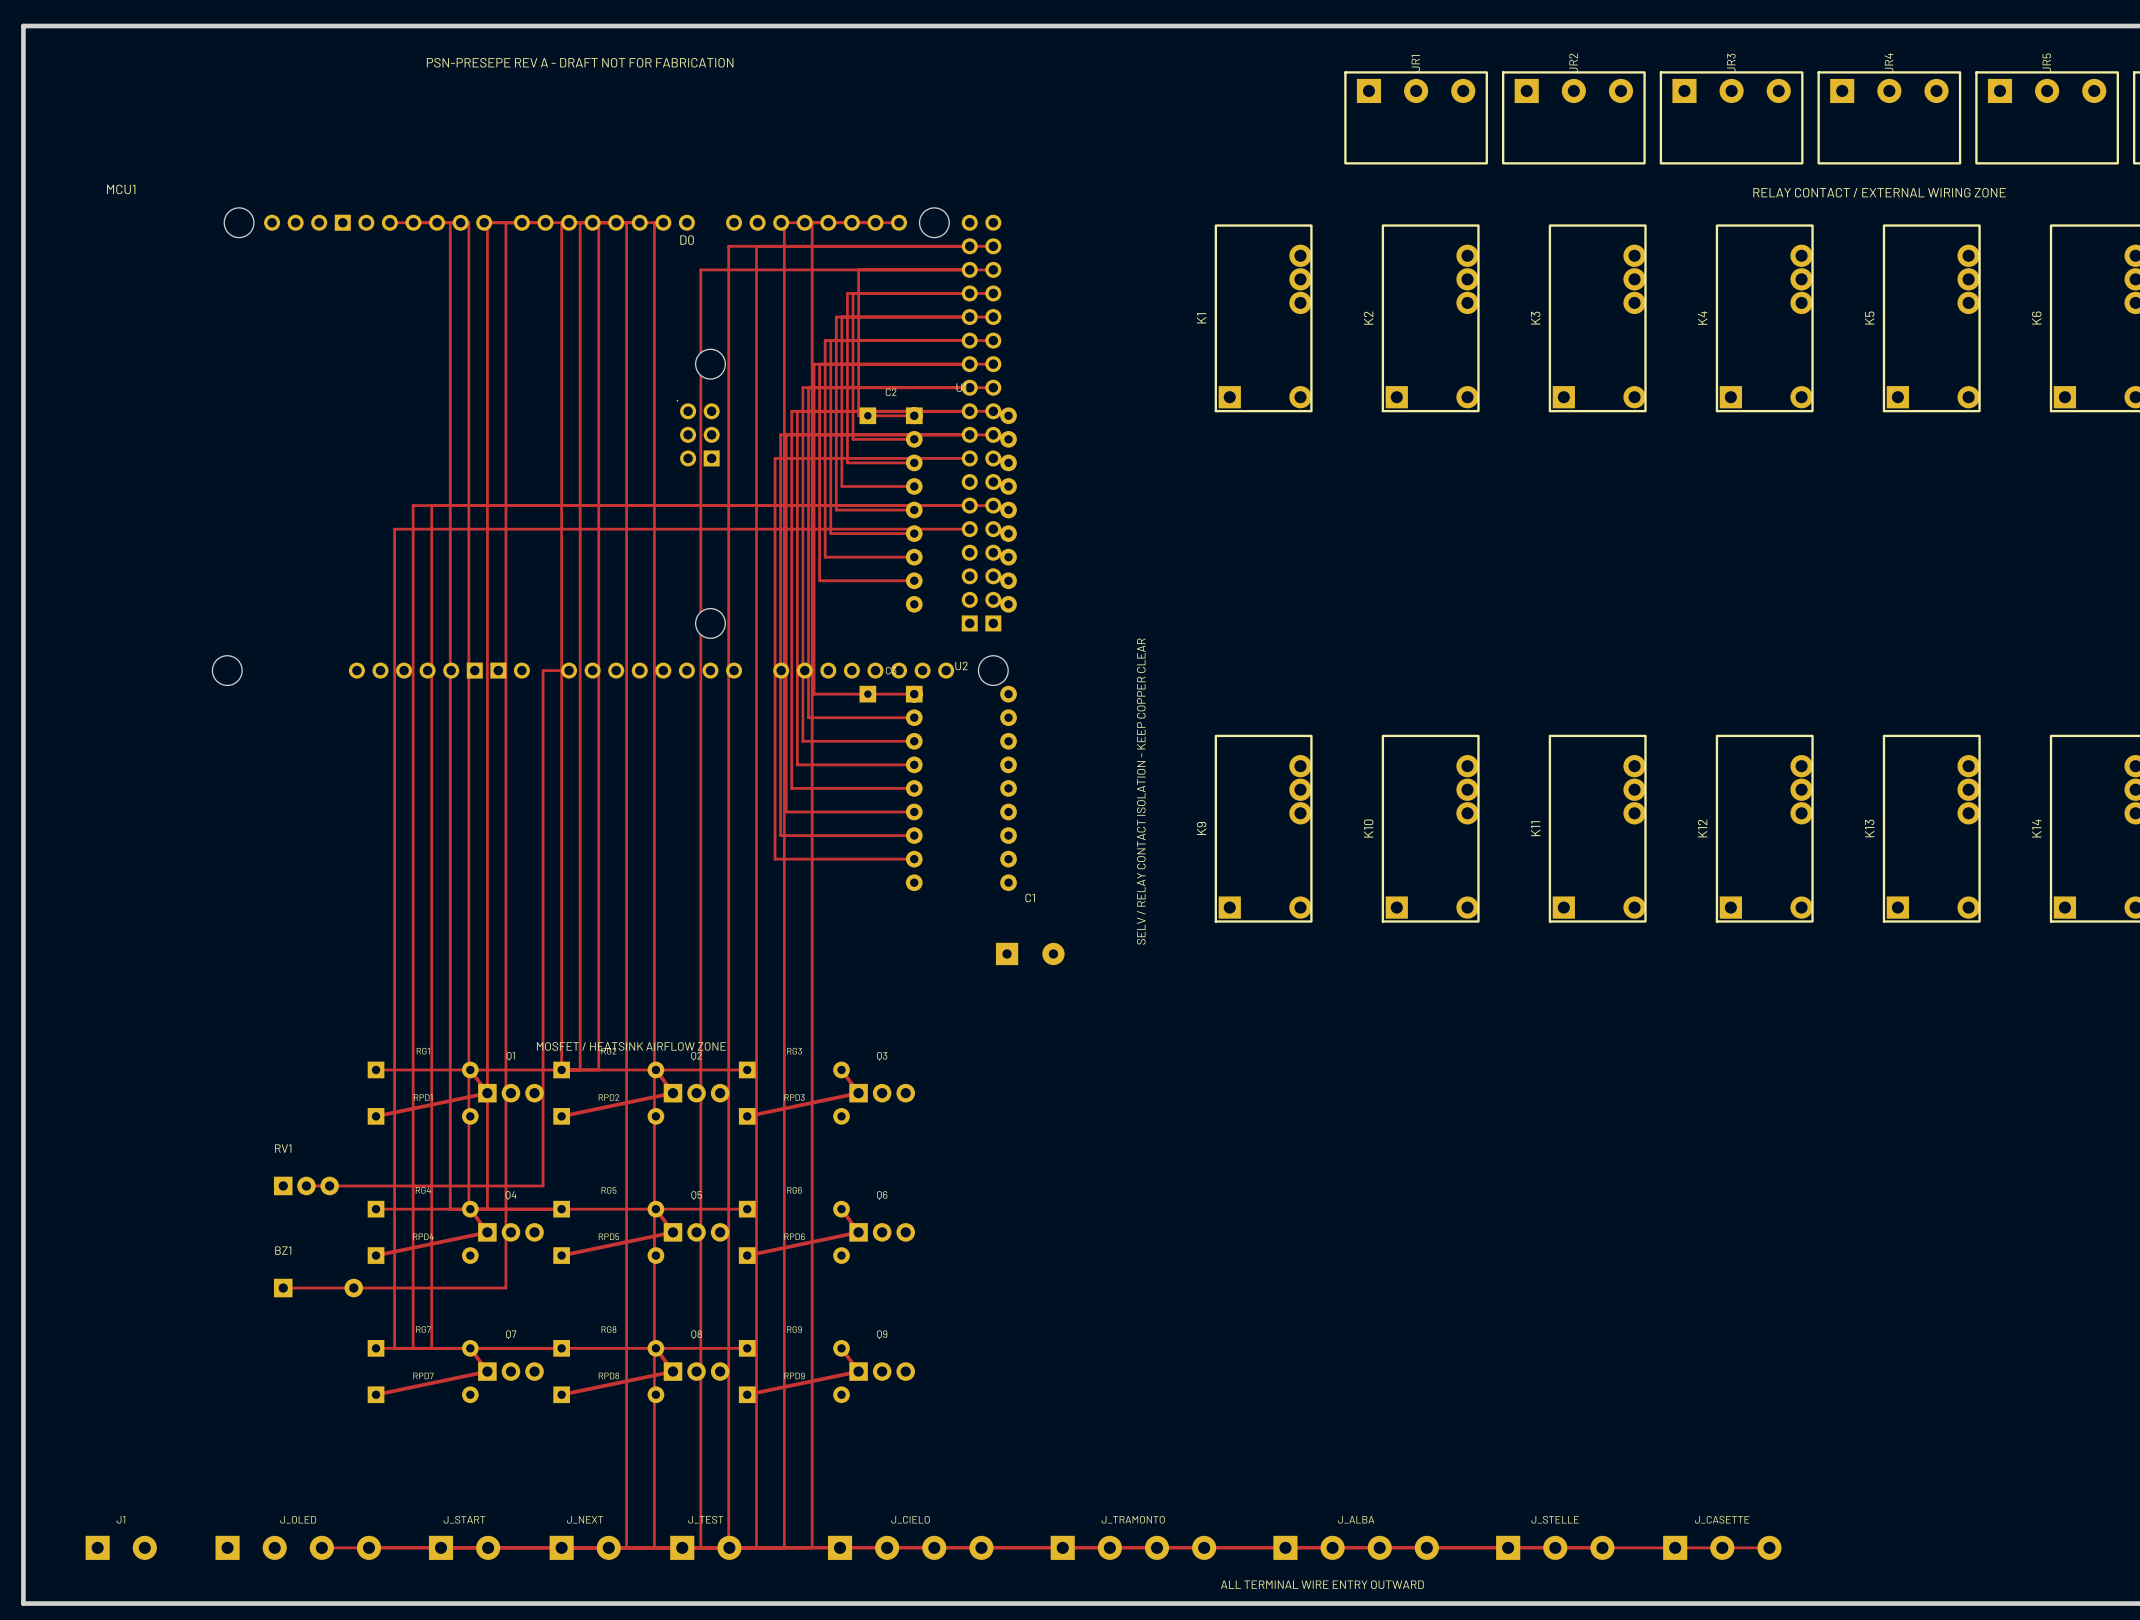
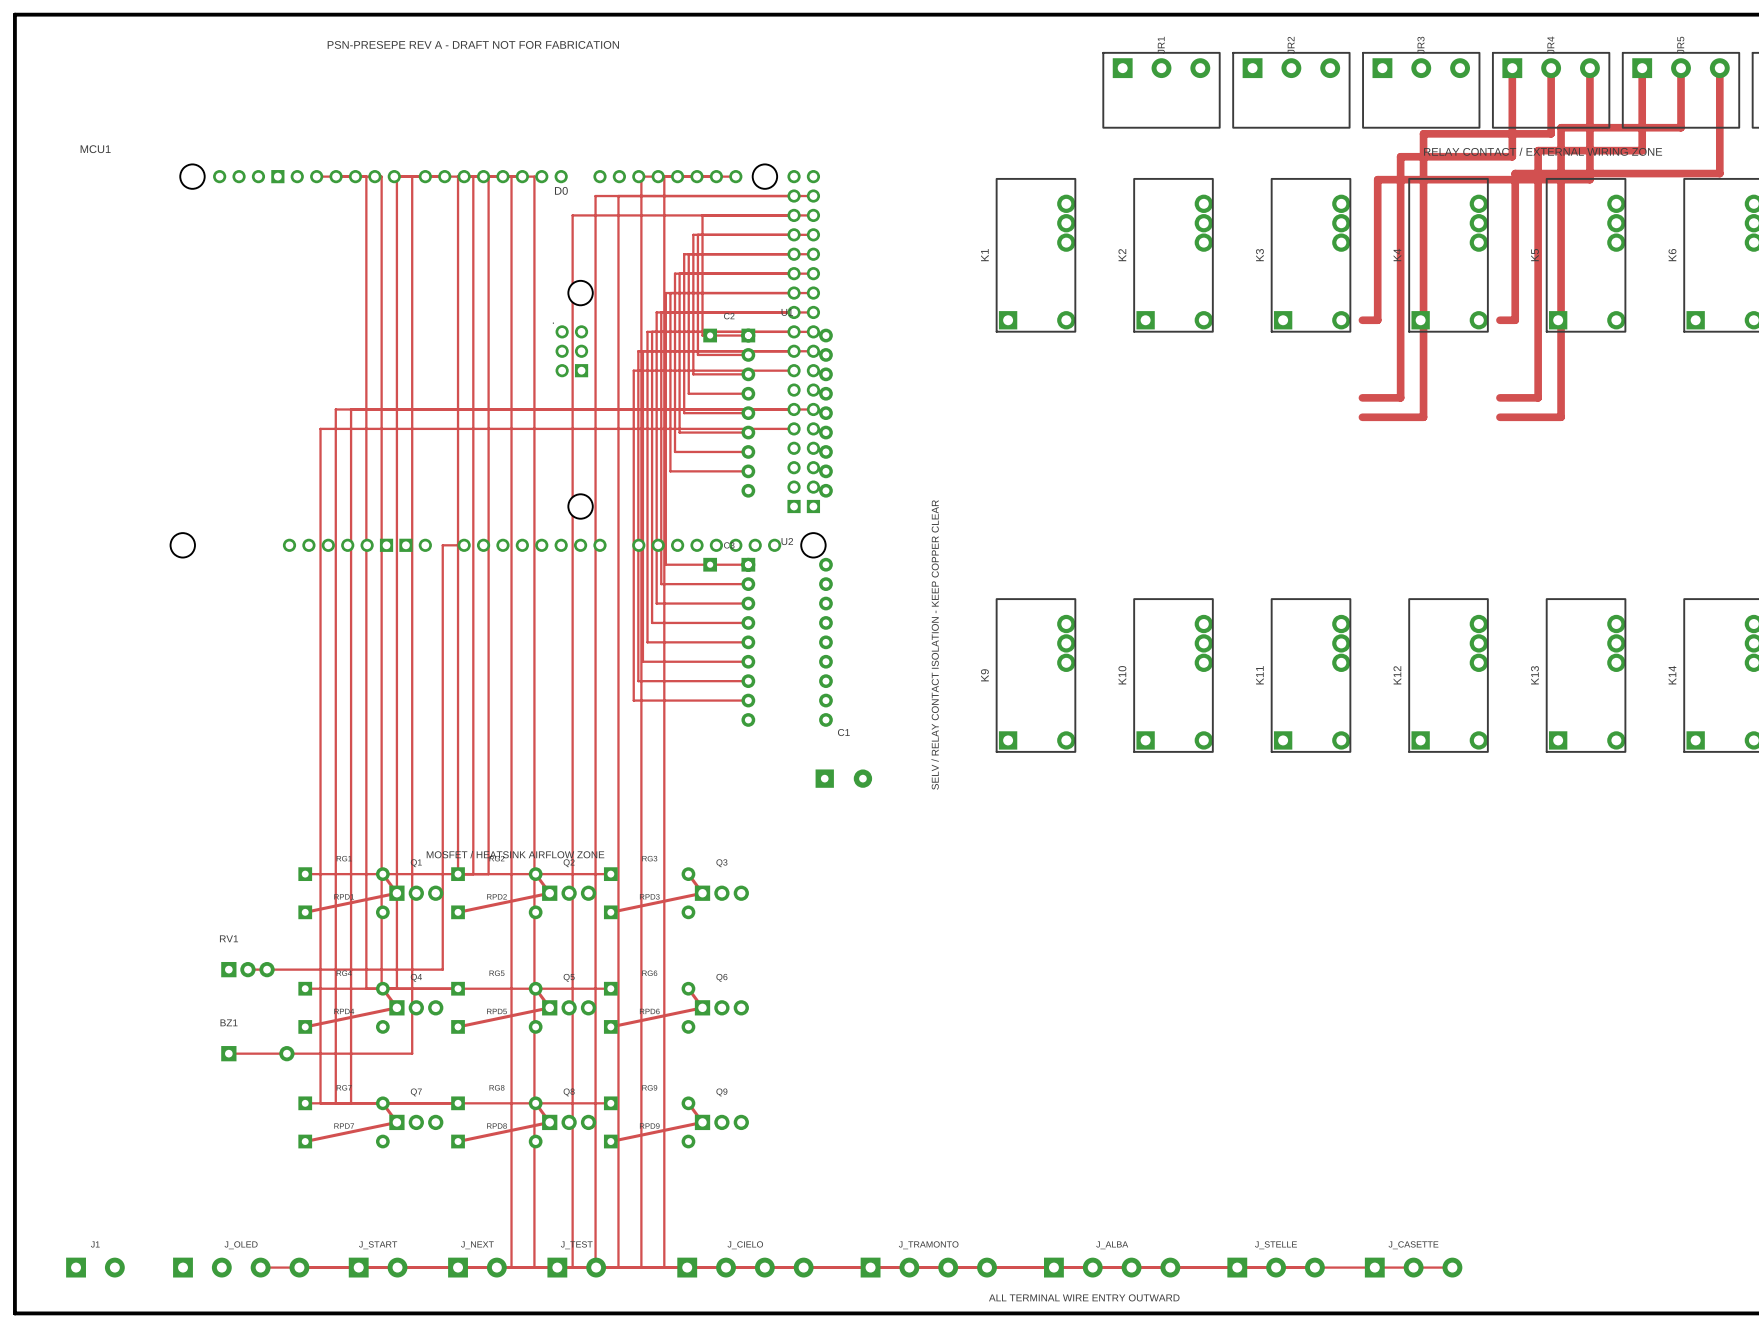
track: none -> (1512, 68) (1512, 156) (1400, 156) (1400, 397) (1362, 397)
track: none -> (1551, 68) (1551, 133) (1423, 133) (1423, 417) (1362, 417)
track: none -> (1589, 68) (1589, 179) (1377, 179) (1377, 320) (1362, 320)
track: none -> (1642, 68) (1642, 150) (1538, 150) (1538, 397) (1499, 397)
track: none -> (1681, 68) (1681, 127) (1561, 127) (1561, 417) (1499, 417)
track: none -> (1719, 68) (1719, 173) (1515, 173) (1515, 320) (1499, 320)

